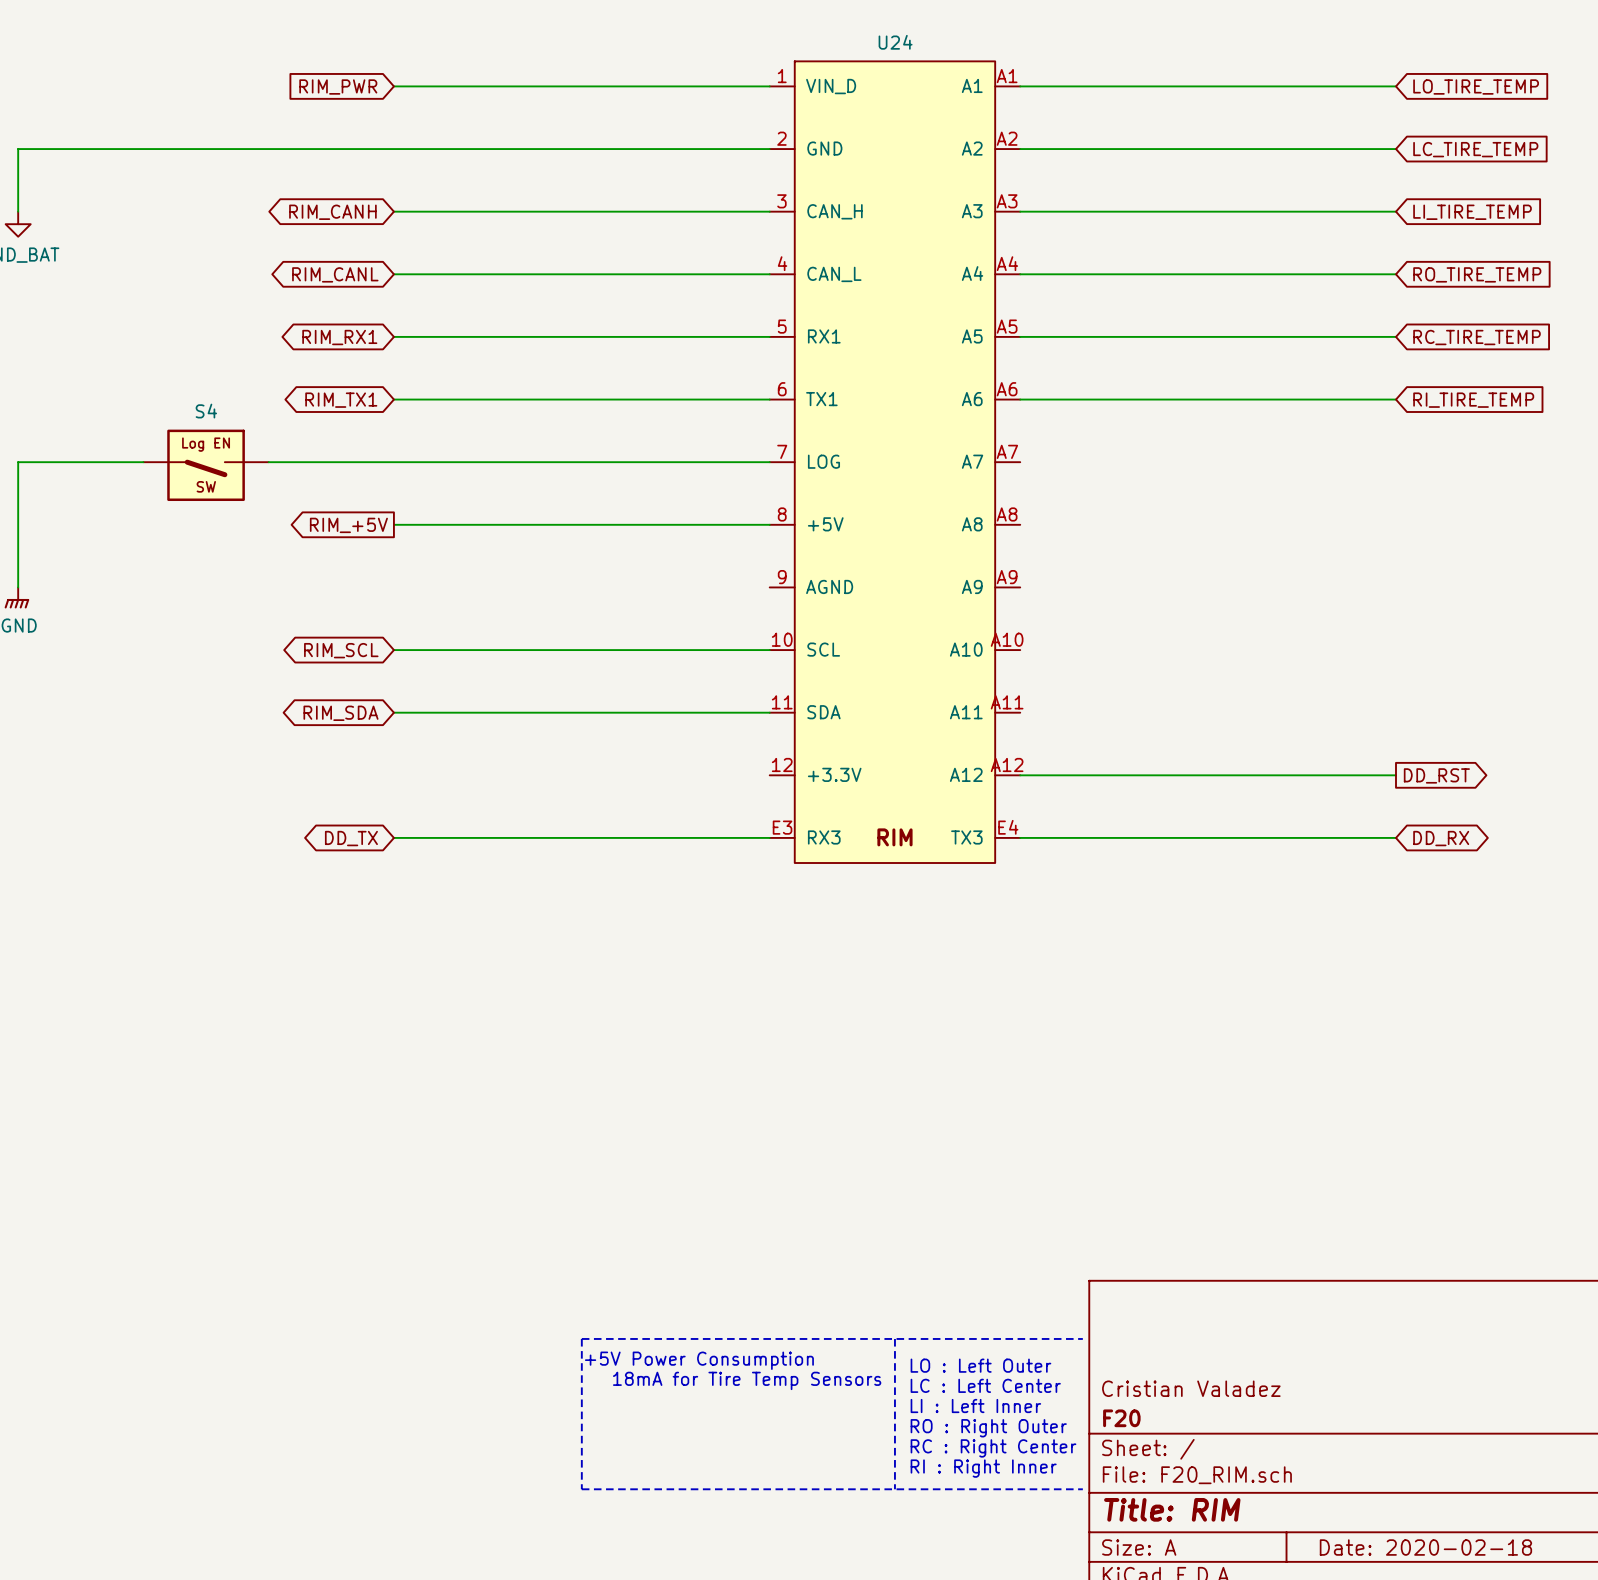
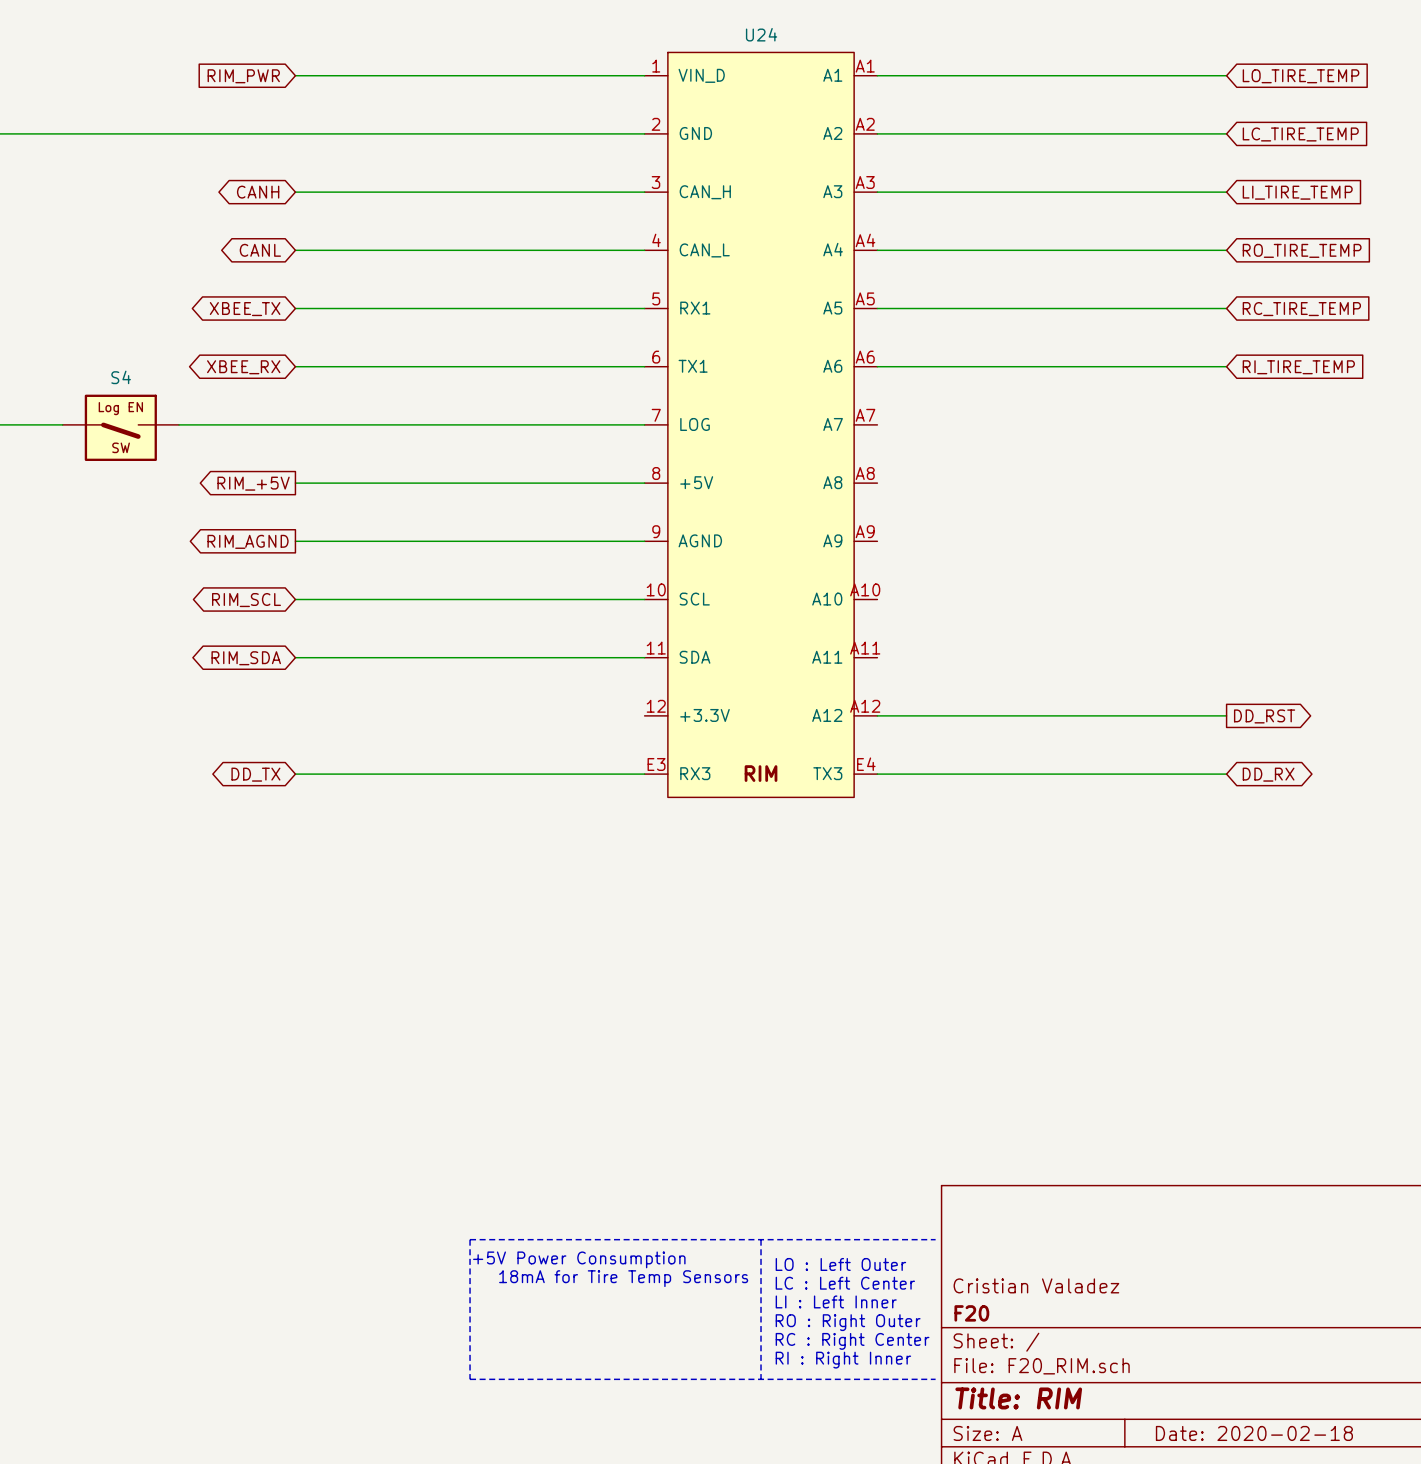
global label: RIM_CANH (332, 212) -> CANH (258, 192)
global label: RIM_CANL (335, 274) -> CANL (260, 250)
global label: RIM_RX1 (339, 337) -> XBEE_TX (245, 309)
global label: RIM_TX1 (341, 400) -> XBEE_RX (243, 367)
wire: none -> (295, 541) (644, 541)
global label: none -> RIM_AGND (248, 541)

